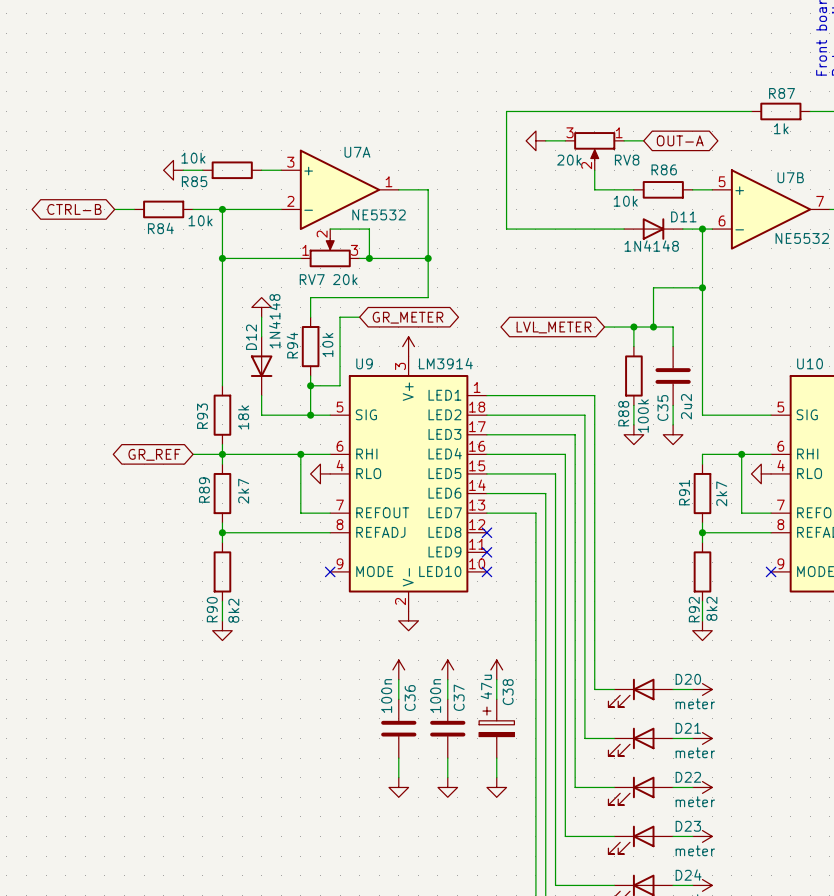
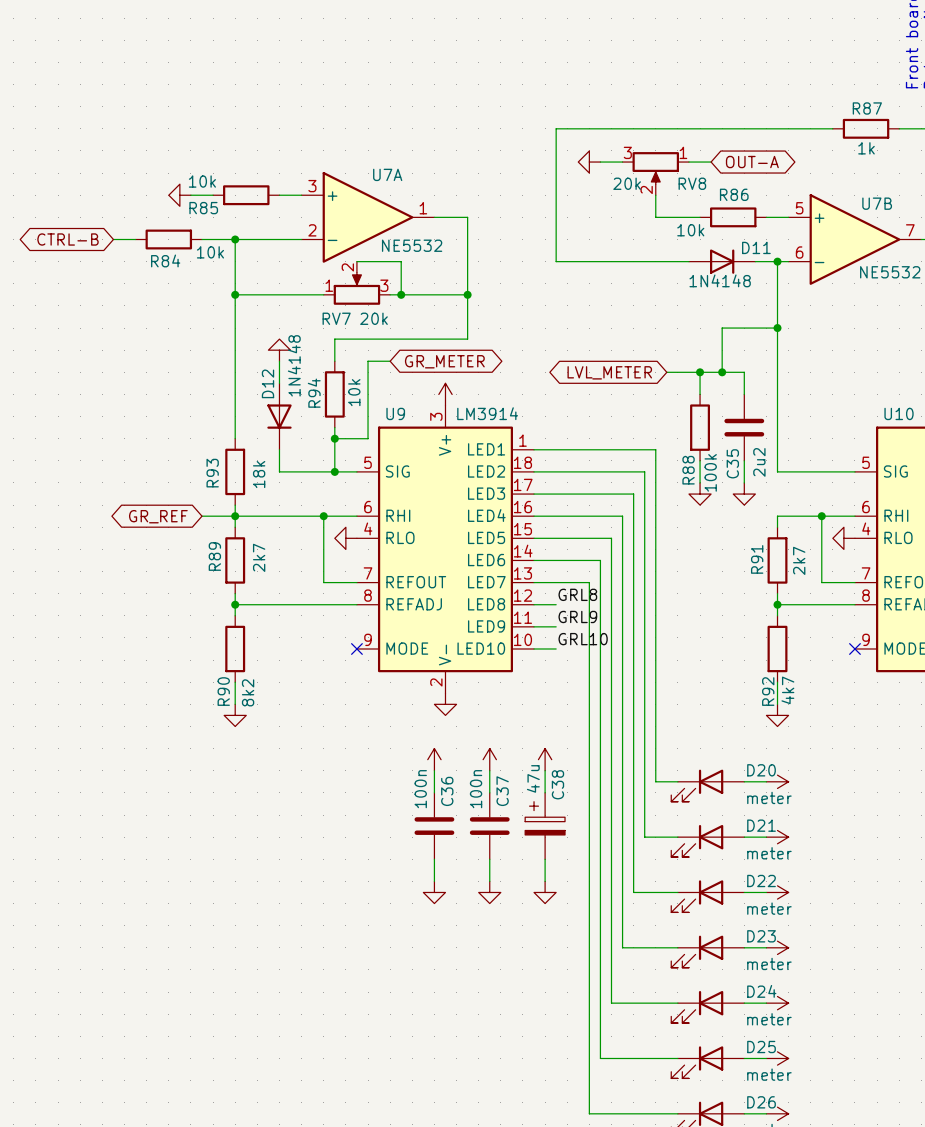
label: none -> GRL8 (577, 594)
wire: none -> (534, 604) (556, 604)
no-connect mark: (486, 532) -> none
label: none -> GRL9 (577, 616)
wire: none -> (534, 626) (556, 626)
no-connect mark: (486, 552) -> none
label: none -> GRL10 (583, 639)
wire: none -> (534, 648) (556, 648)
no-connect mark: (486, 571) -> none
R92 value: 8k2 (711, 608) -> 4k7 (787, 690)

